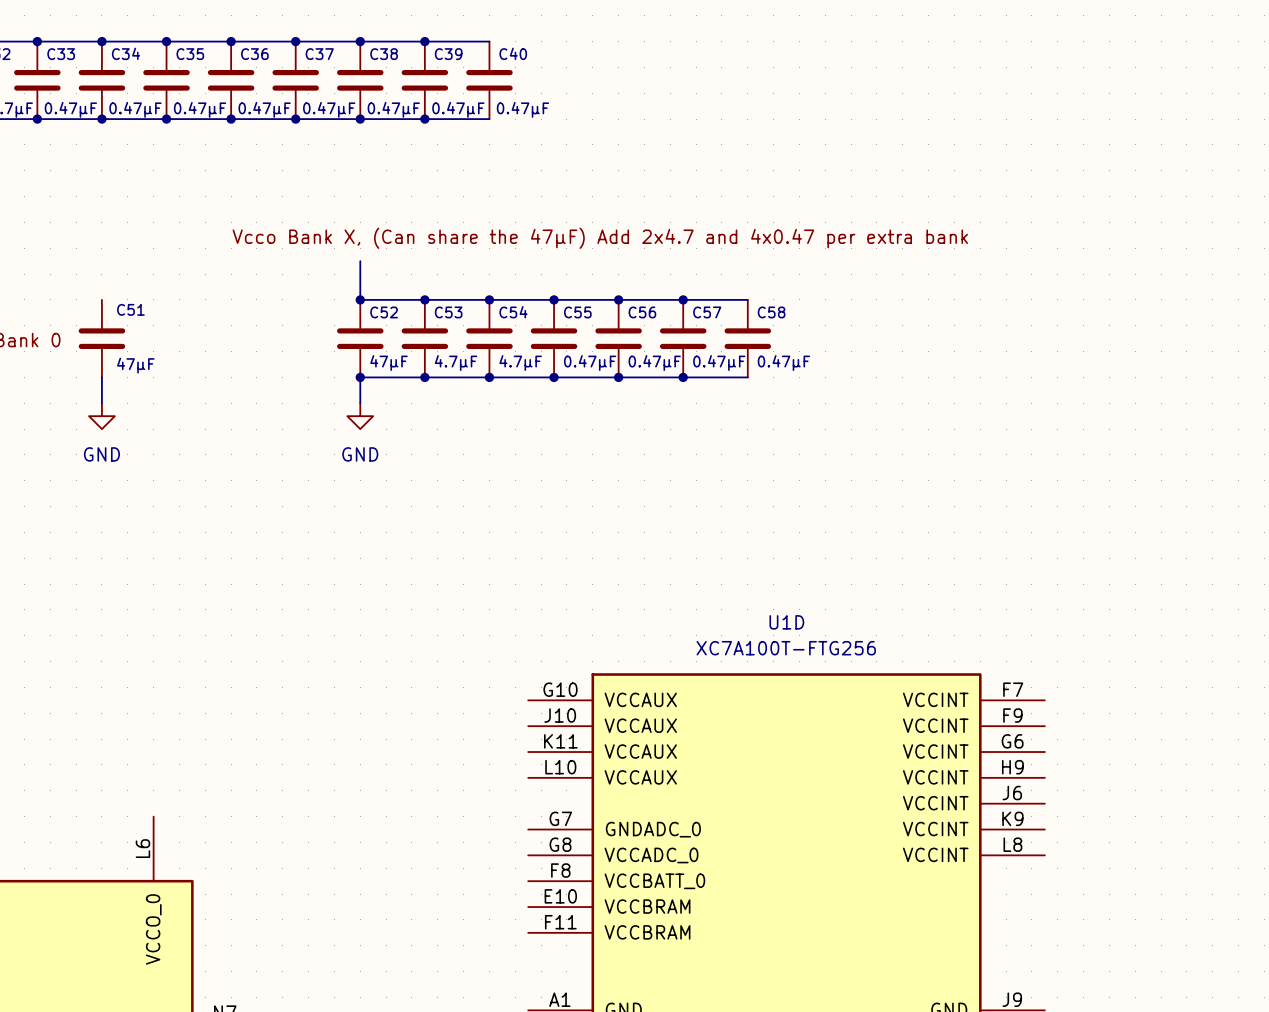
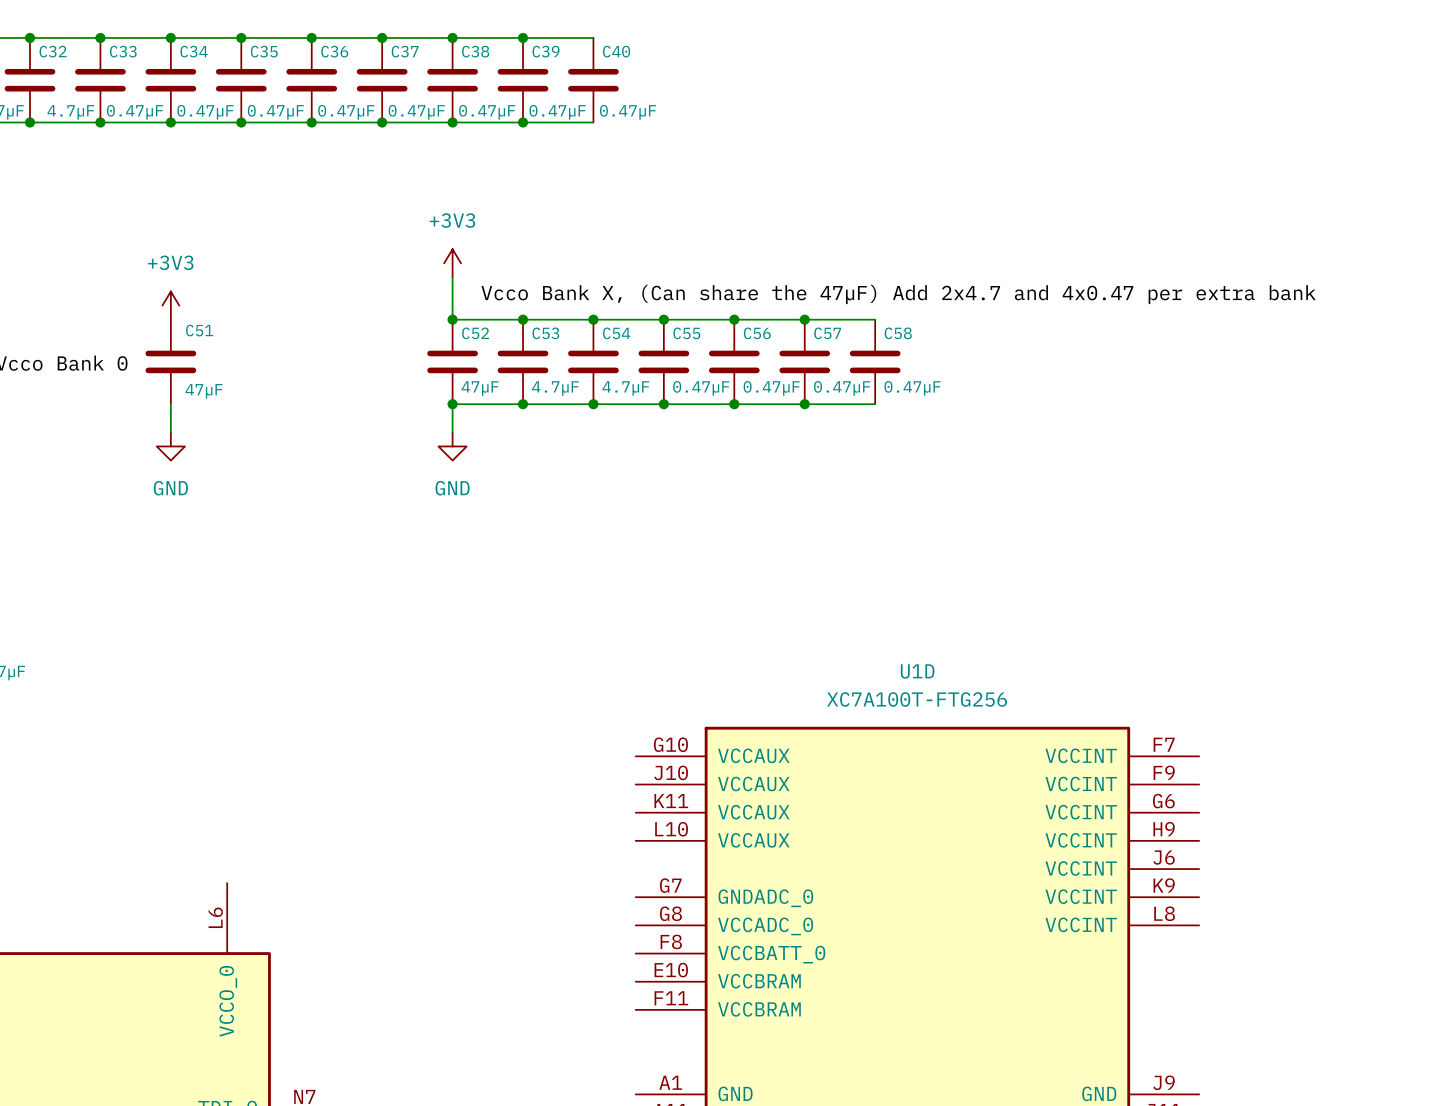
label position: Vcco Bank X, (Can share the 47µF) Add 2x4.7 and 4x0.47 per extra bank (600, 238) -> Vcco Bank X, (Can share the 47µF) Add 2x4.7 and 4x0.47 per extra bank (898, 294)
power symbol: none -> +3V3 (452, 263)
power symbol: none -> +3V3 (170, 305)

